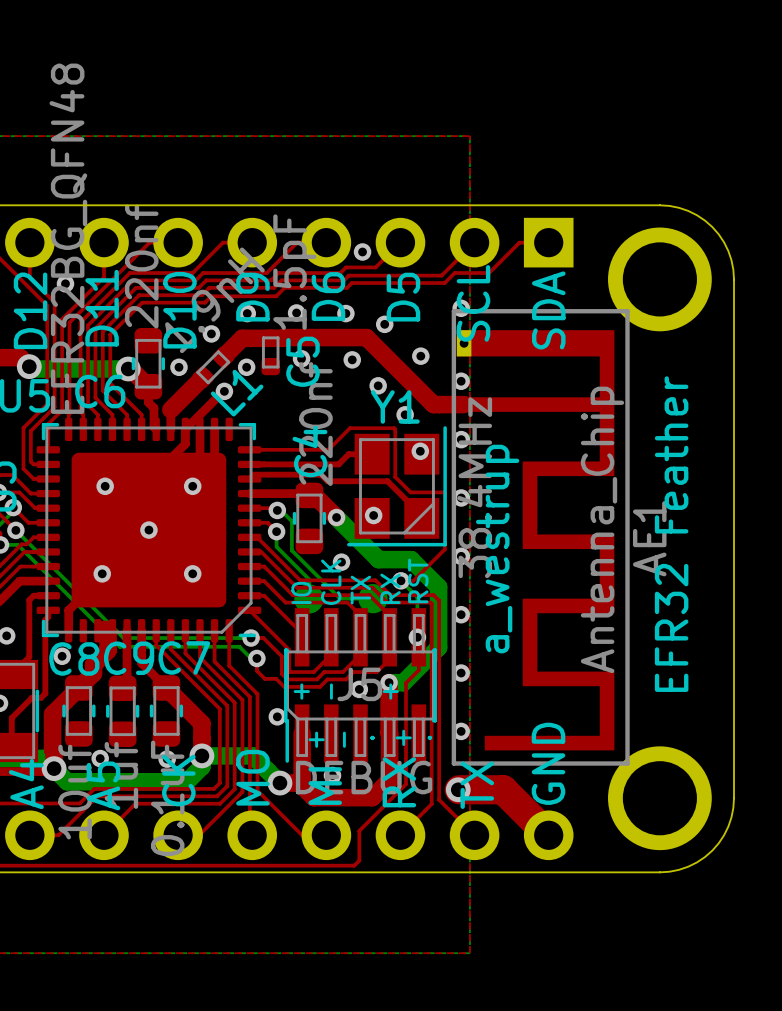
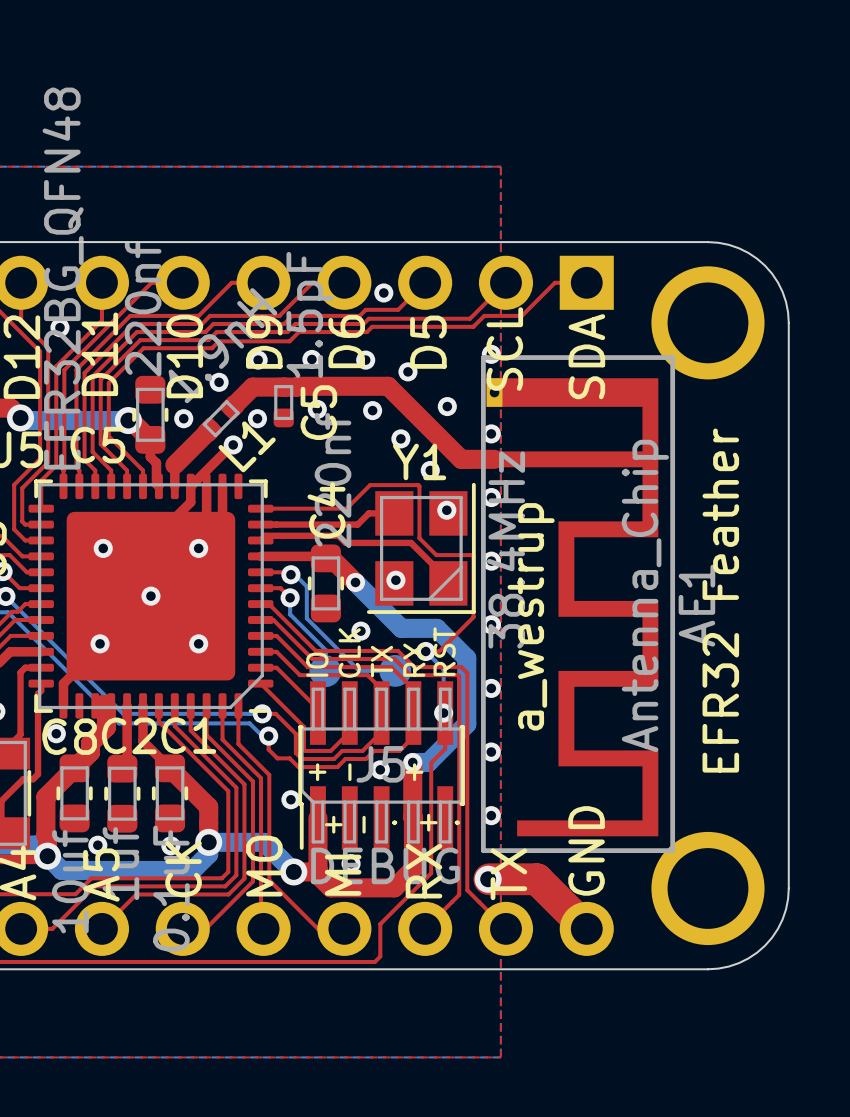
C6 name: C6 (100, 391) -> C5 (97, 445)
C7 name: C7 (184, 657) -> C1 (188, 735)
C9 name: C9 (129, 658) -> C2 (129, 735)

